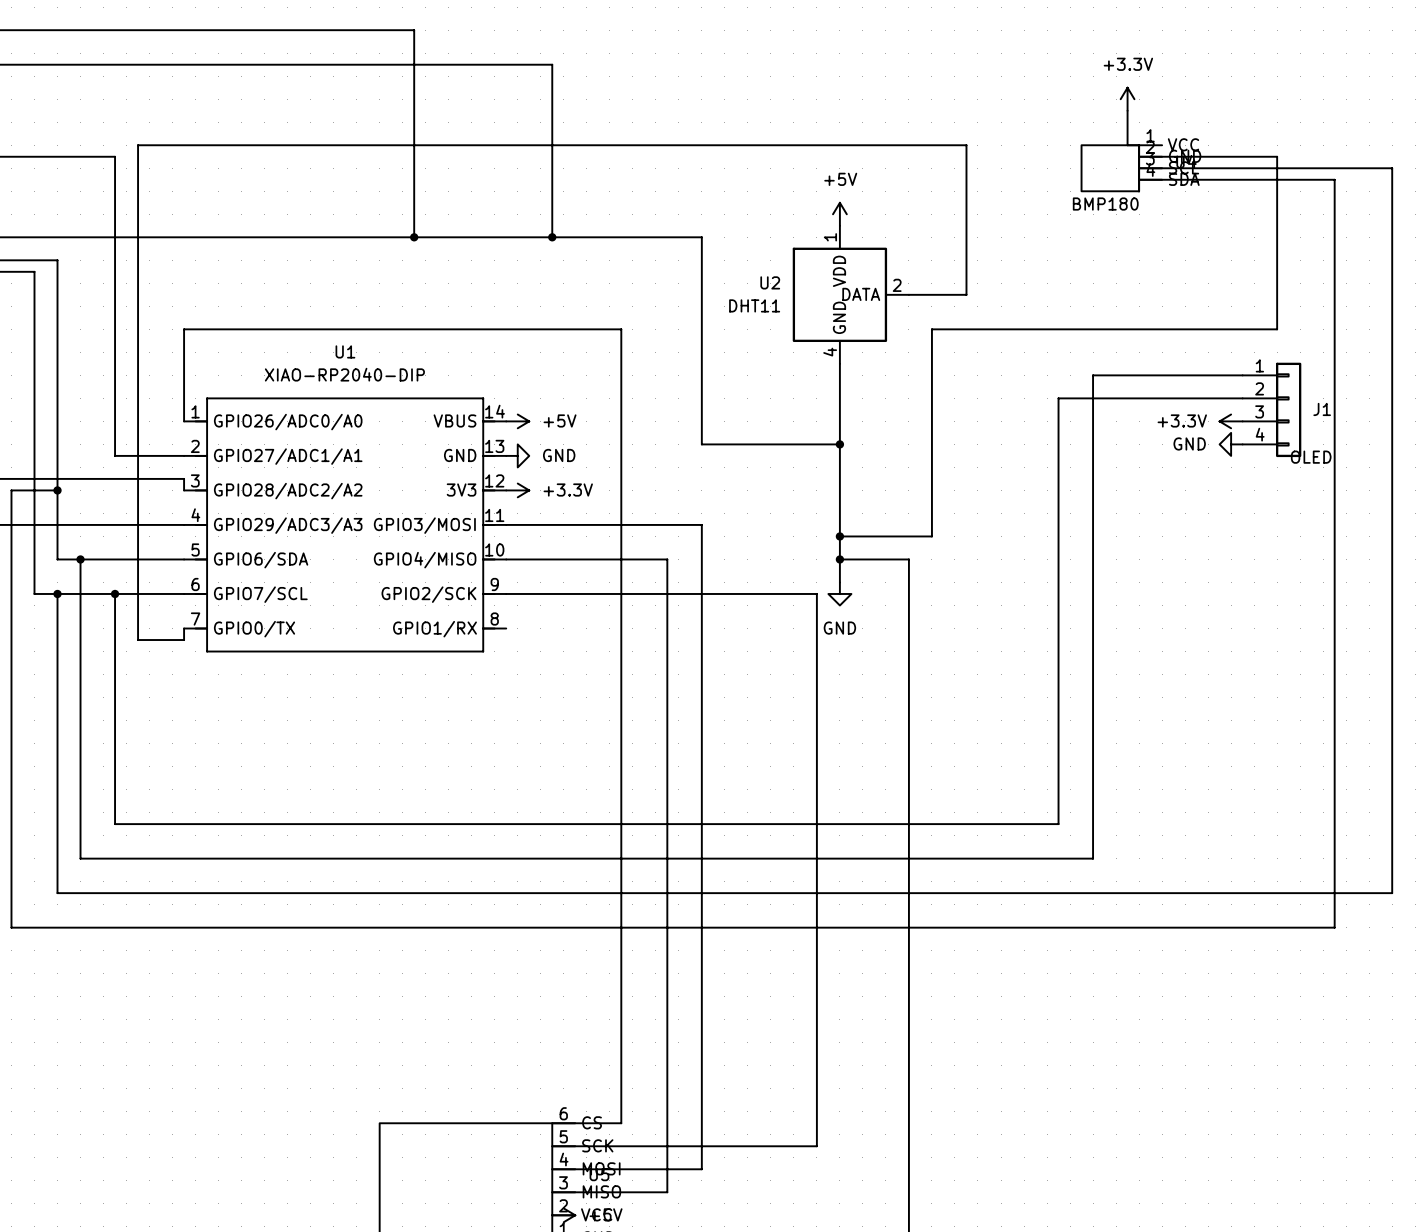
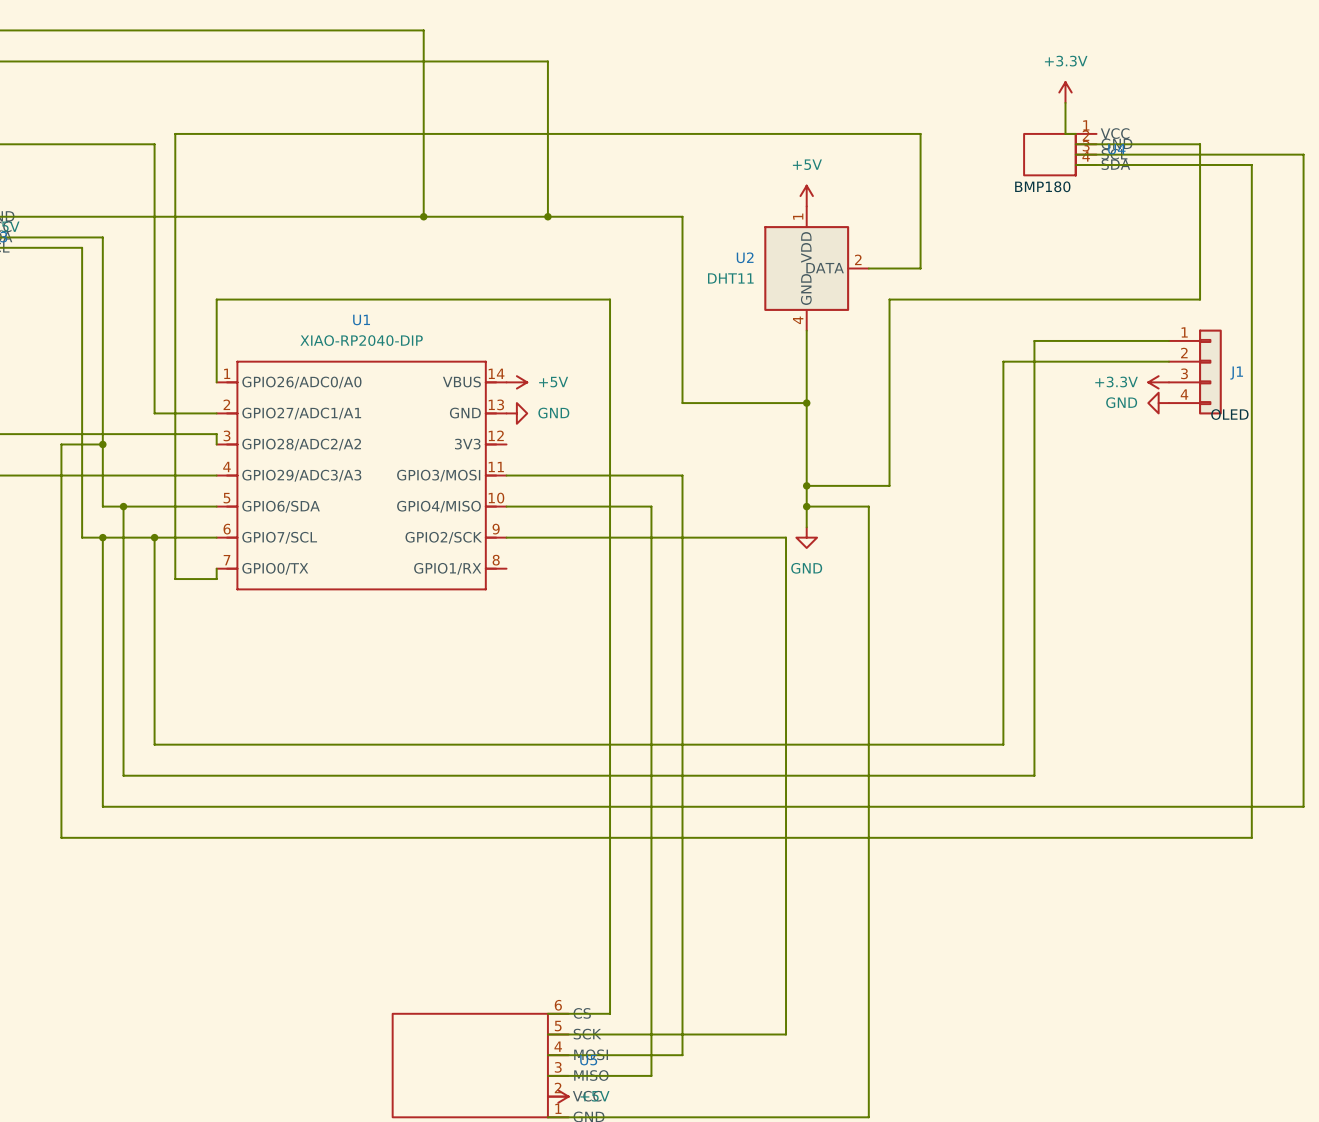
power symbol: +3.3V (517, 490) -> none

